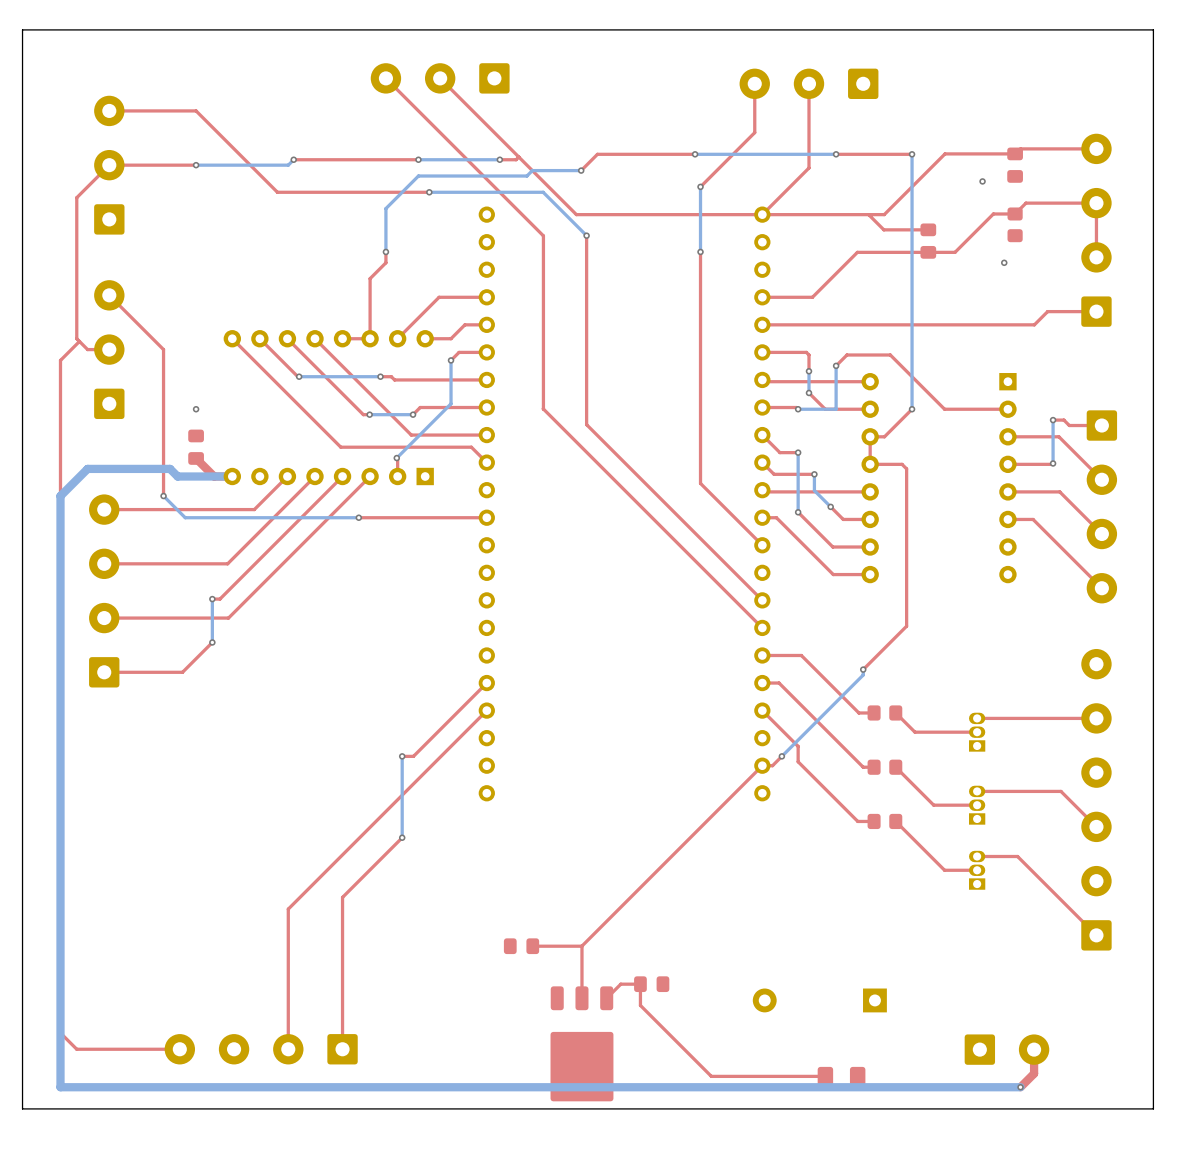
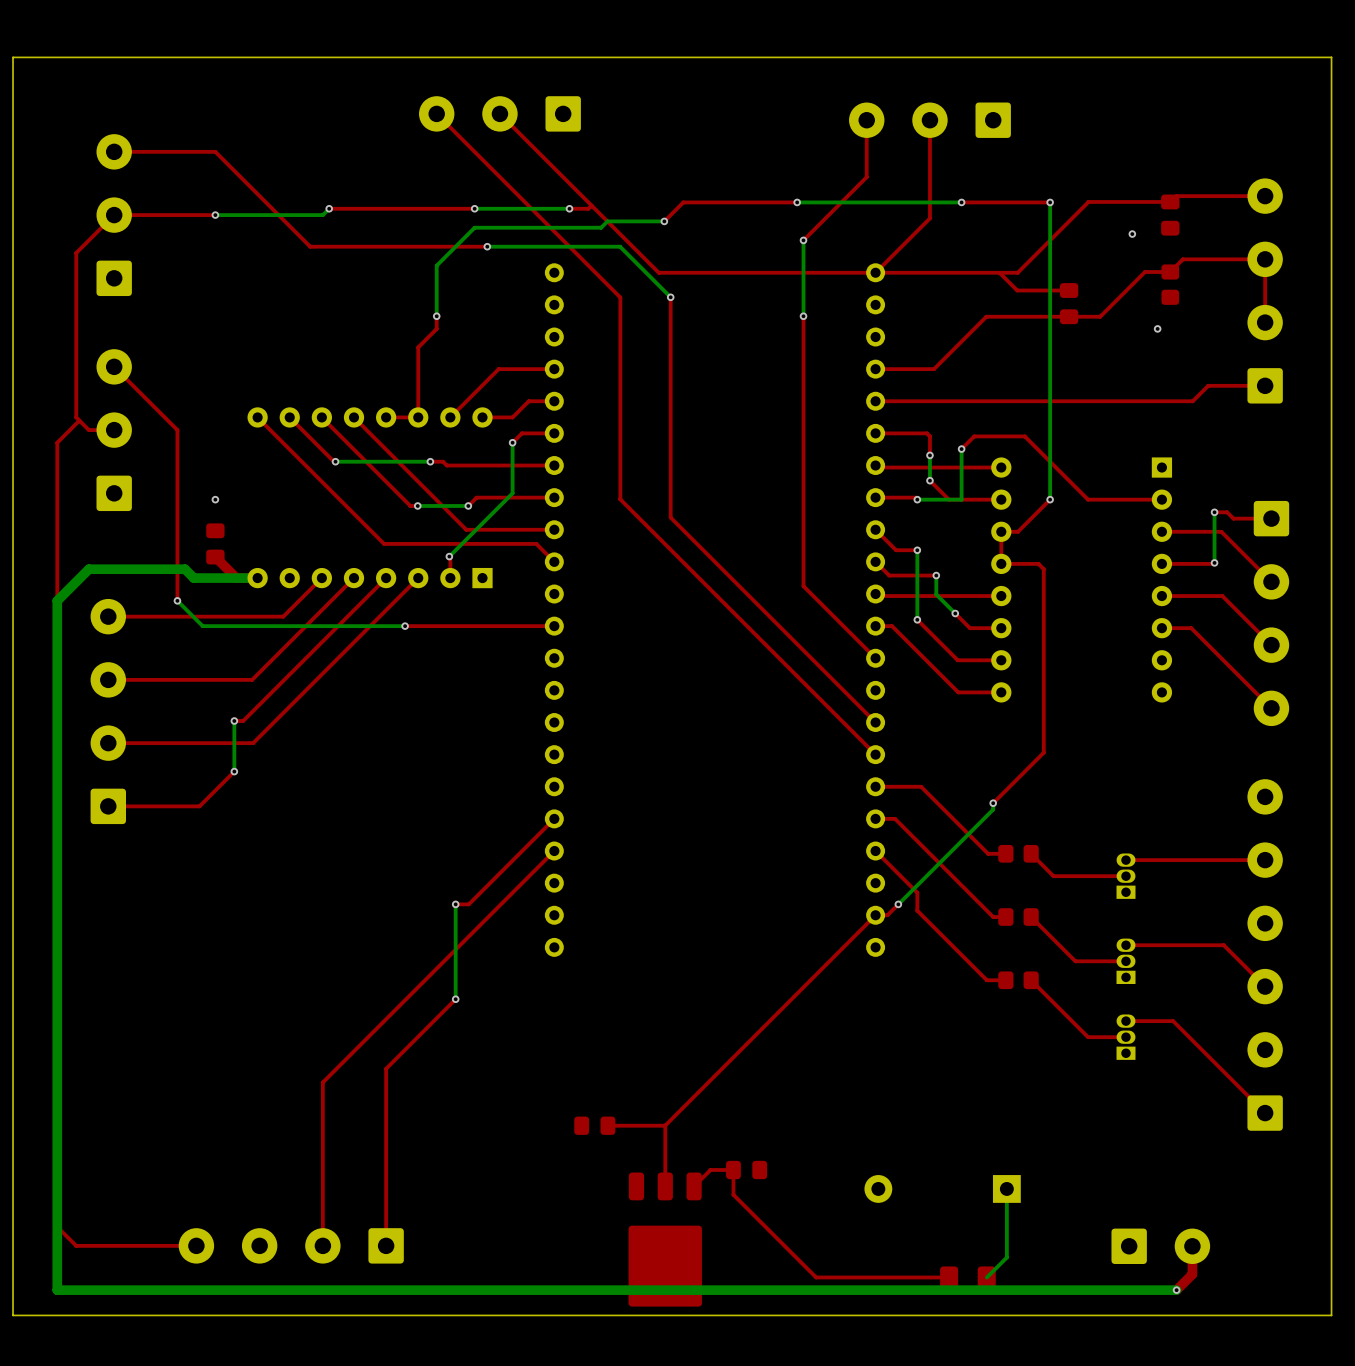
bottom track: none -> (1006, 1188) (1006, 1257) (986, 1277)

